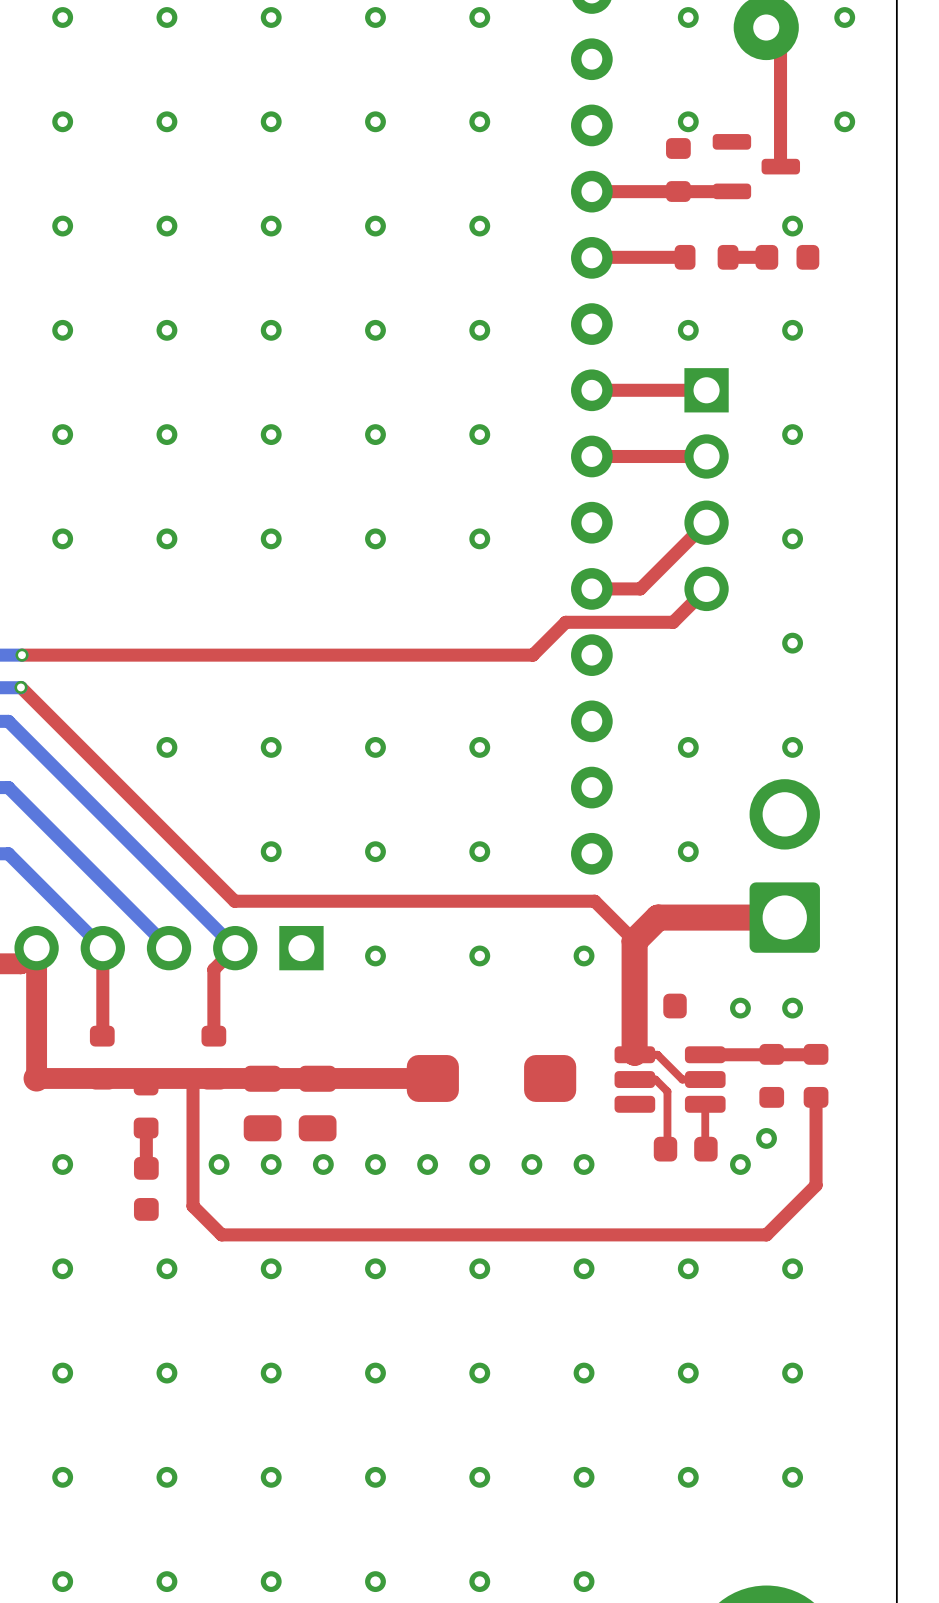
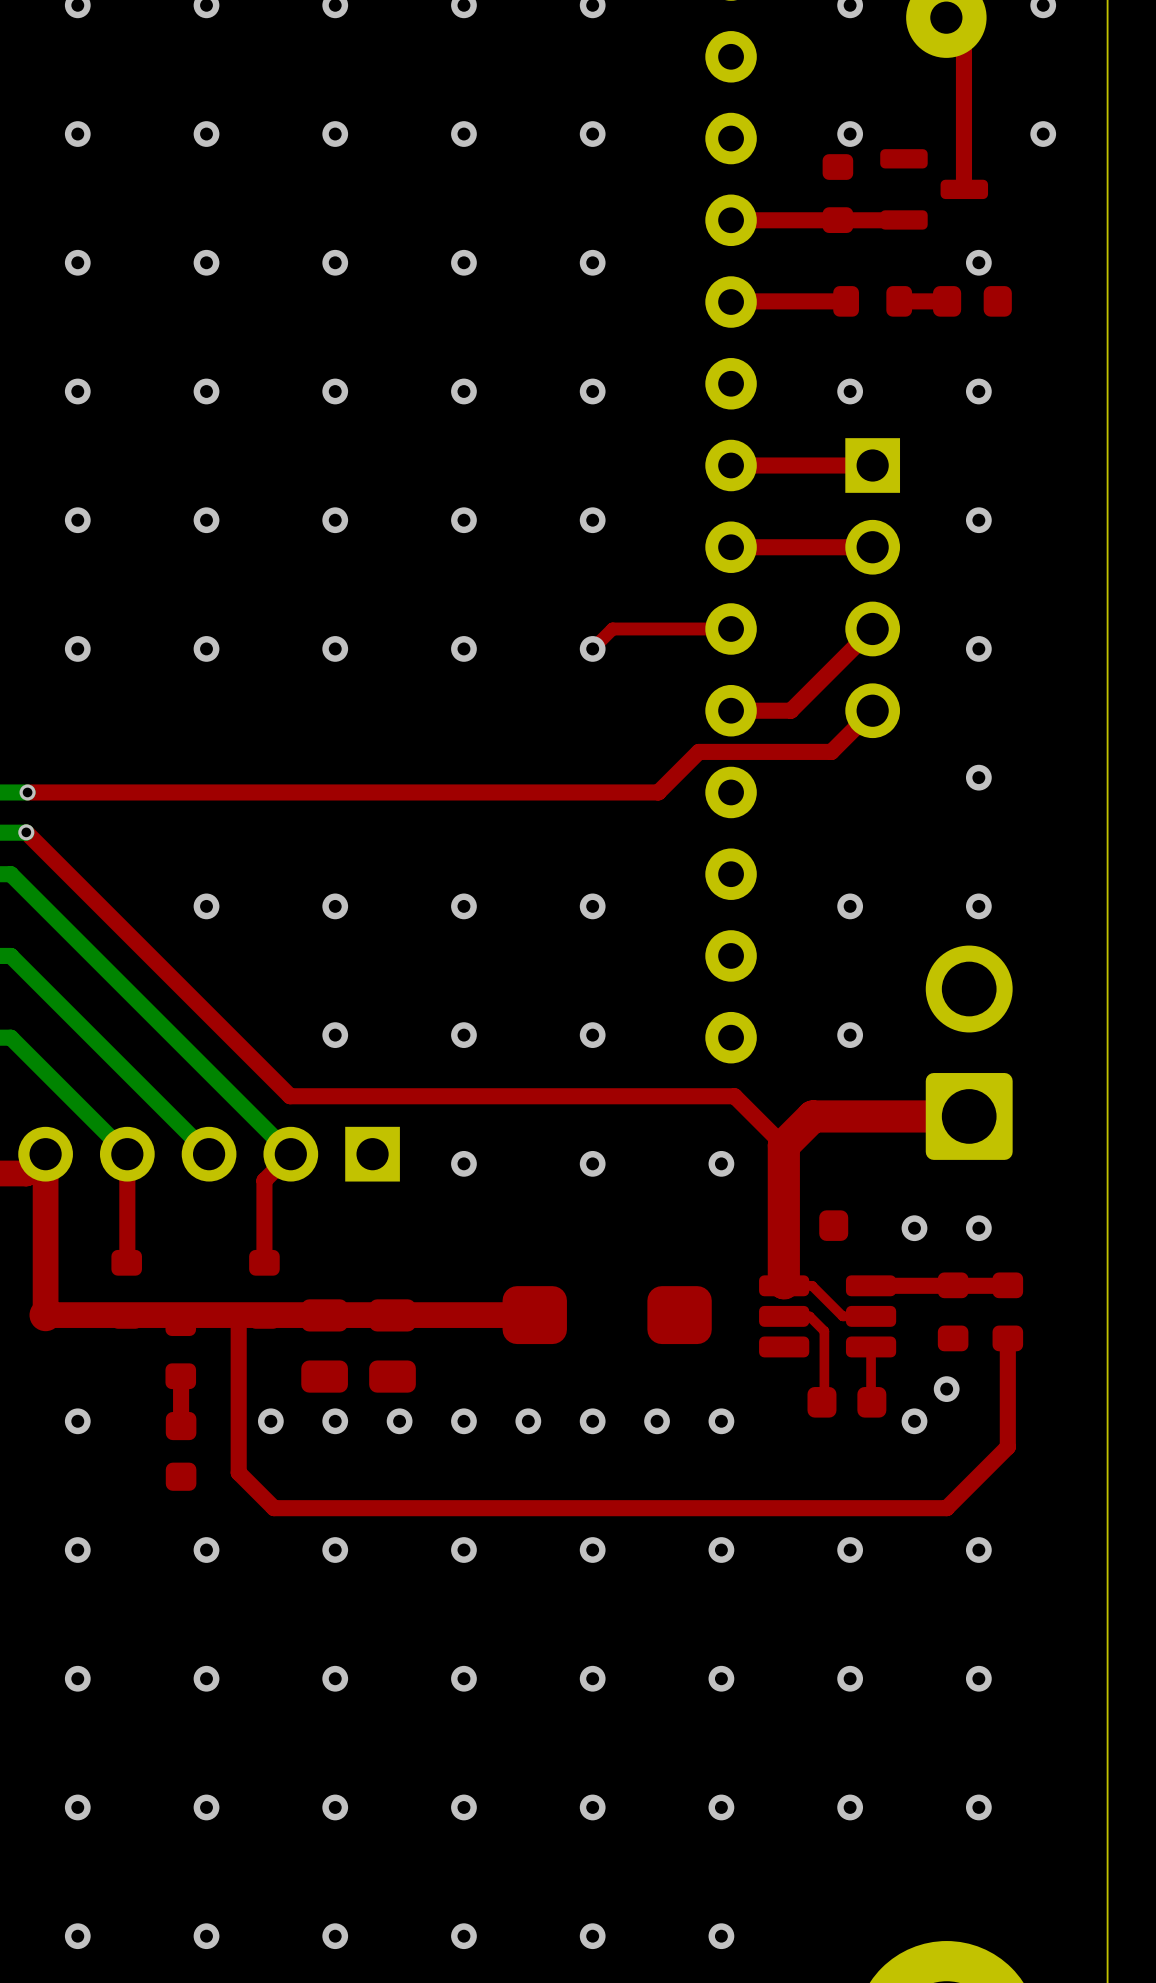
top track: none -> (731, 628) (612, 628) (592, 648)

